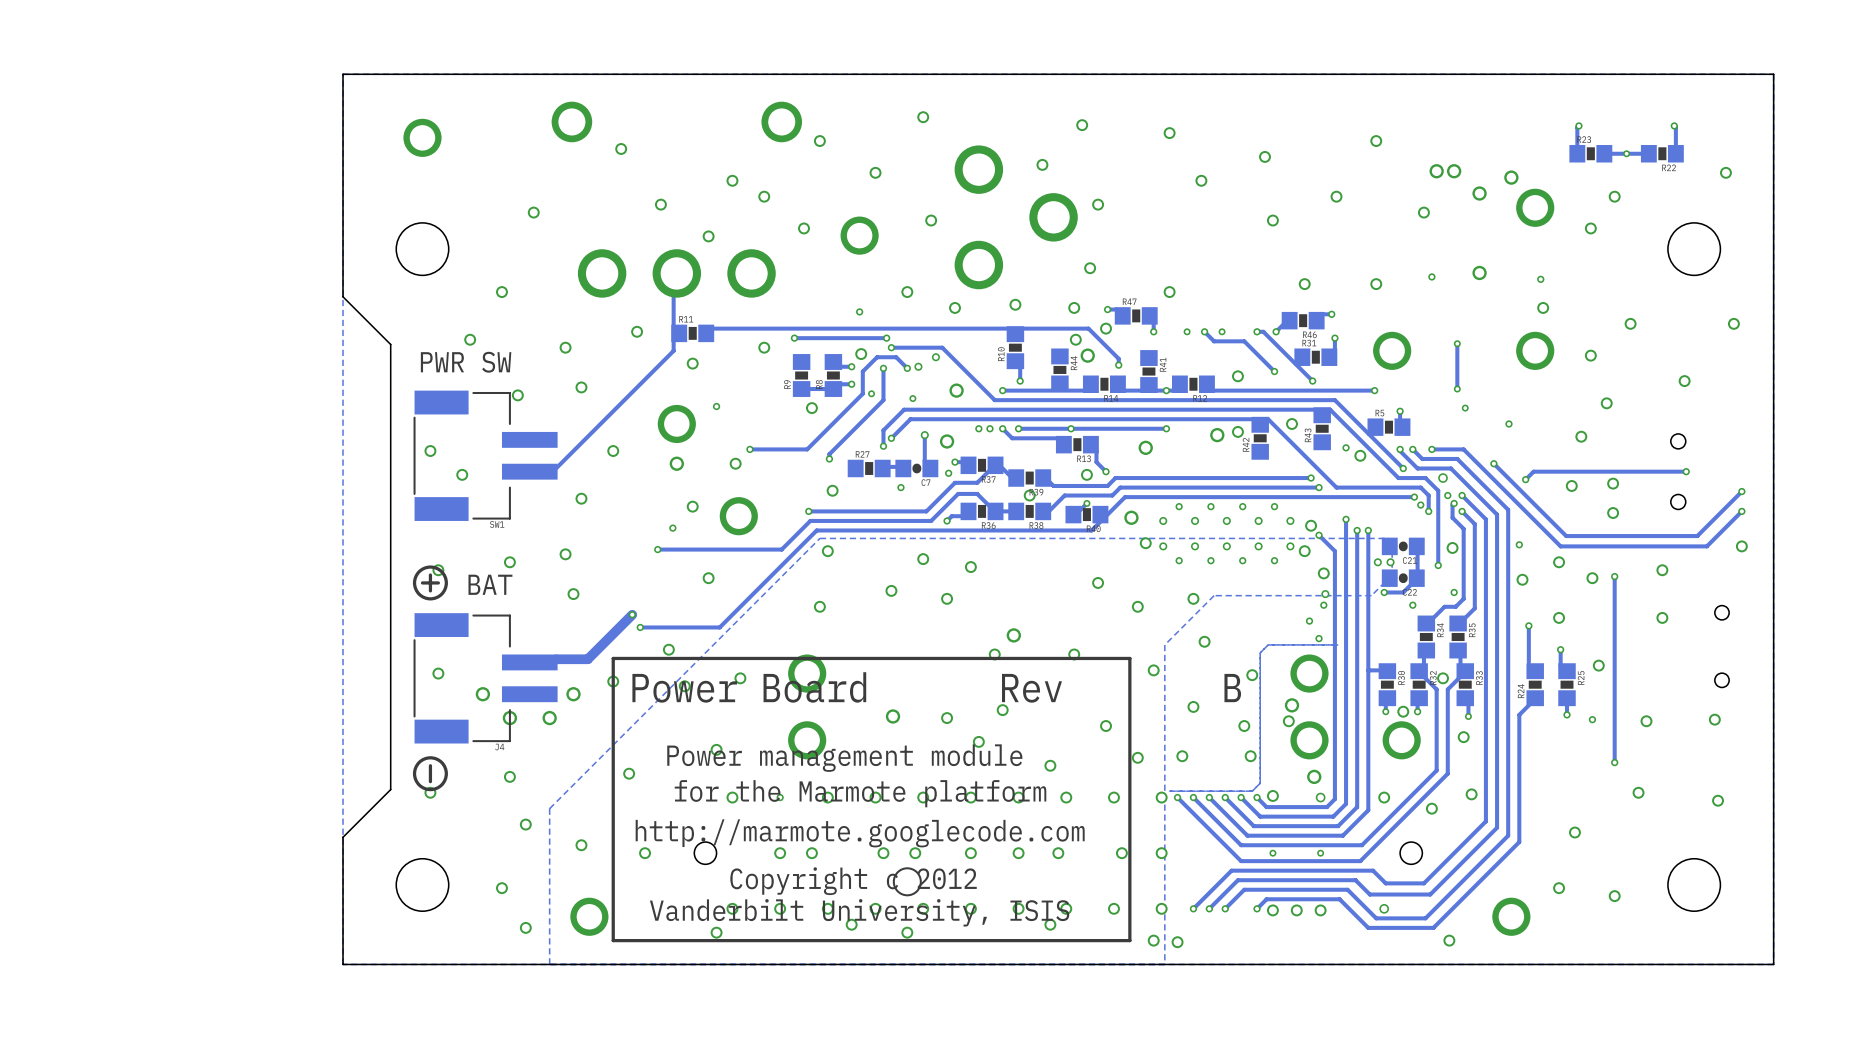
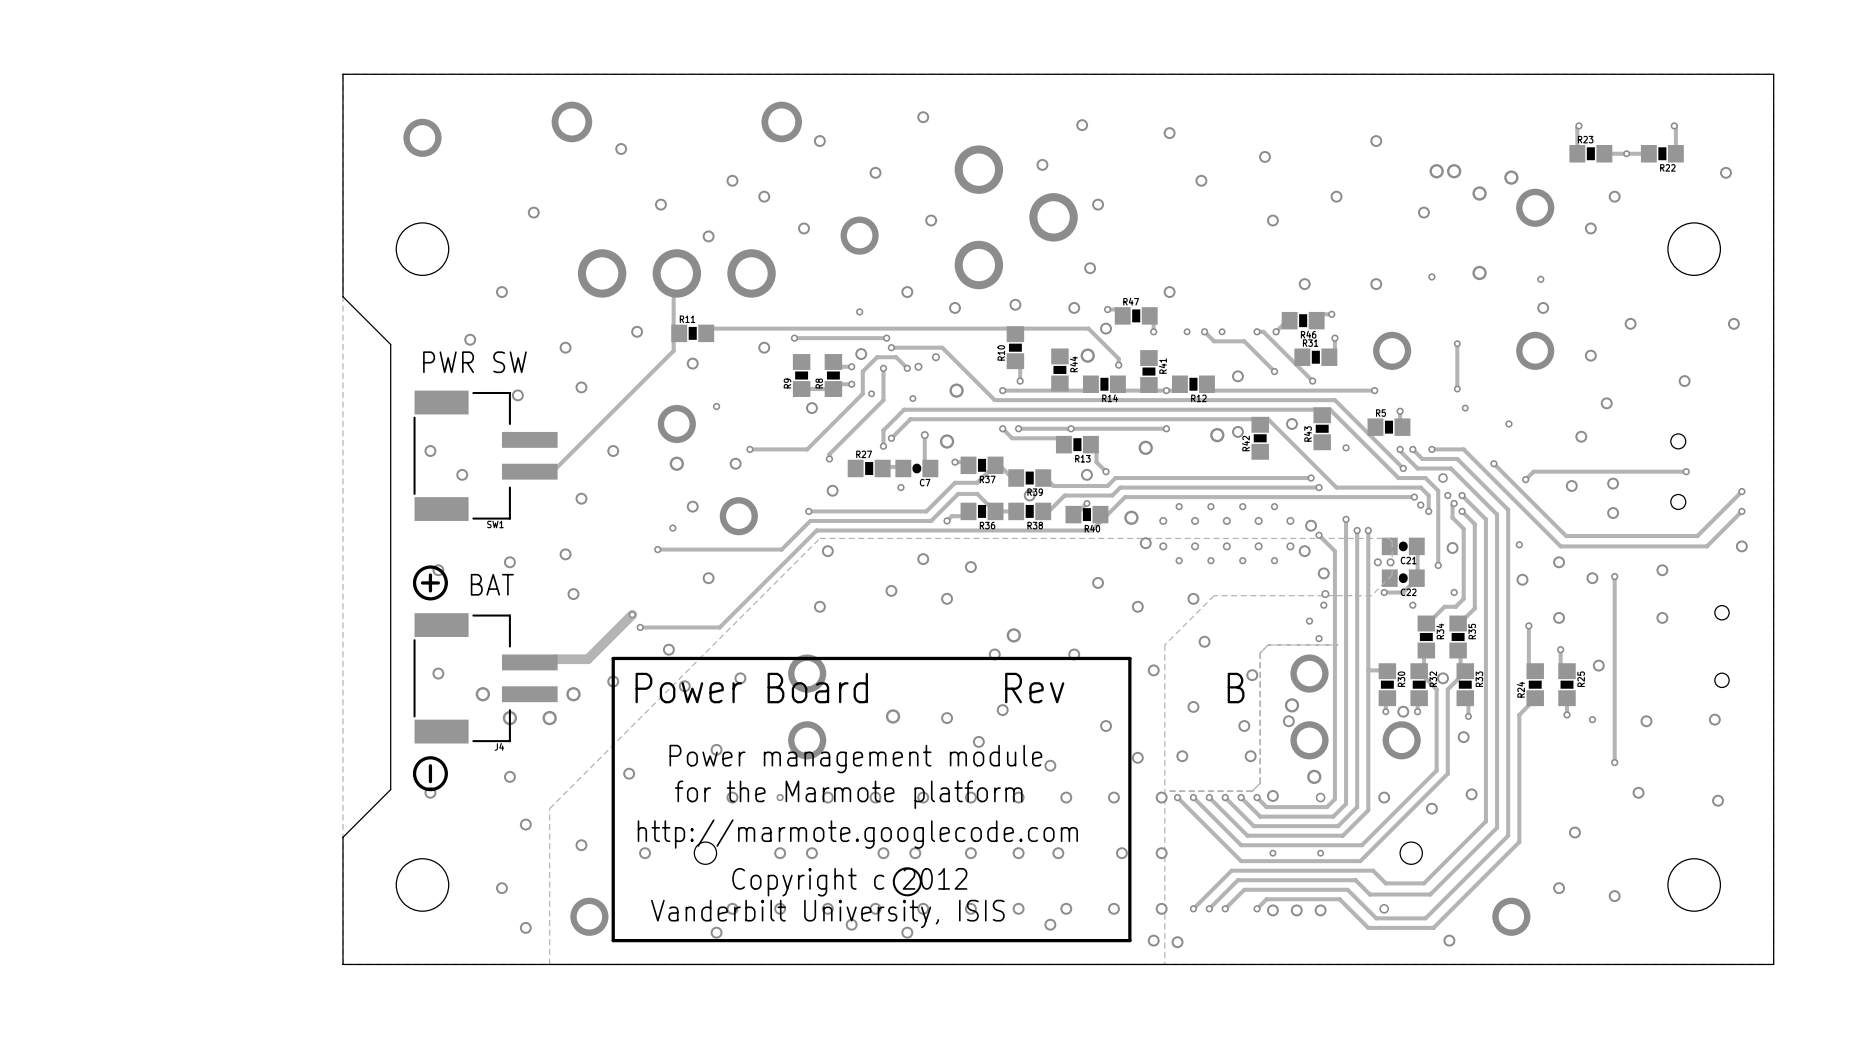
via: (1075, 339) -> none
via: (978, 428) -> none
via: (989, 428) -> none
via: (1360, 455) -> none
via: (948, 473) -> none

